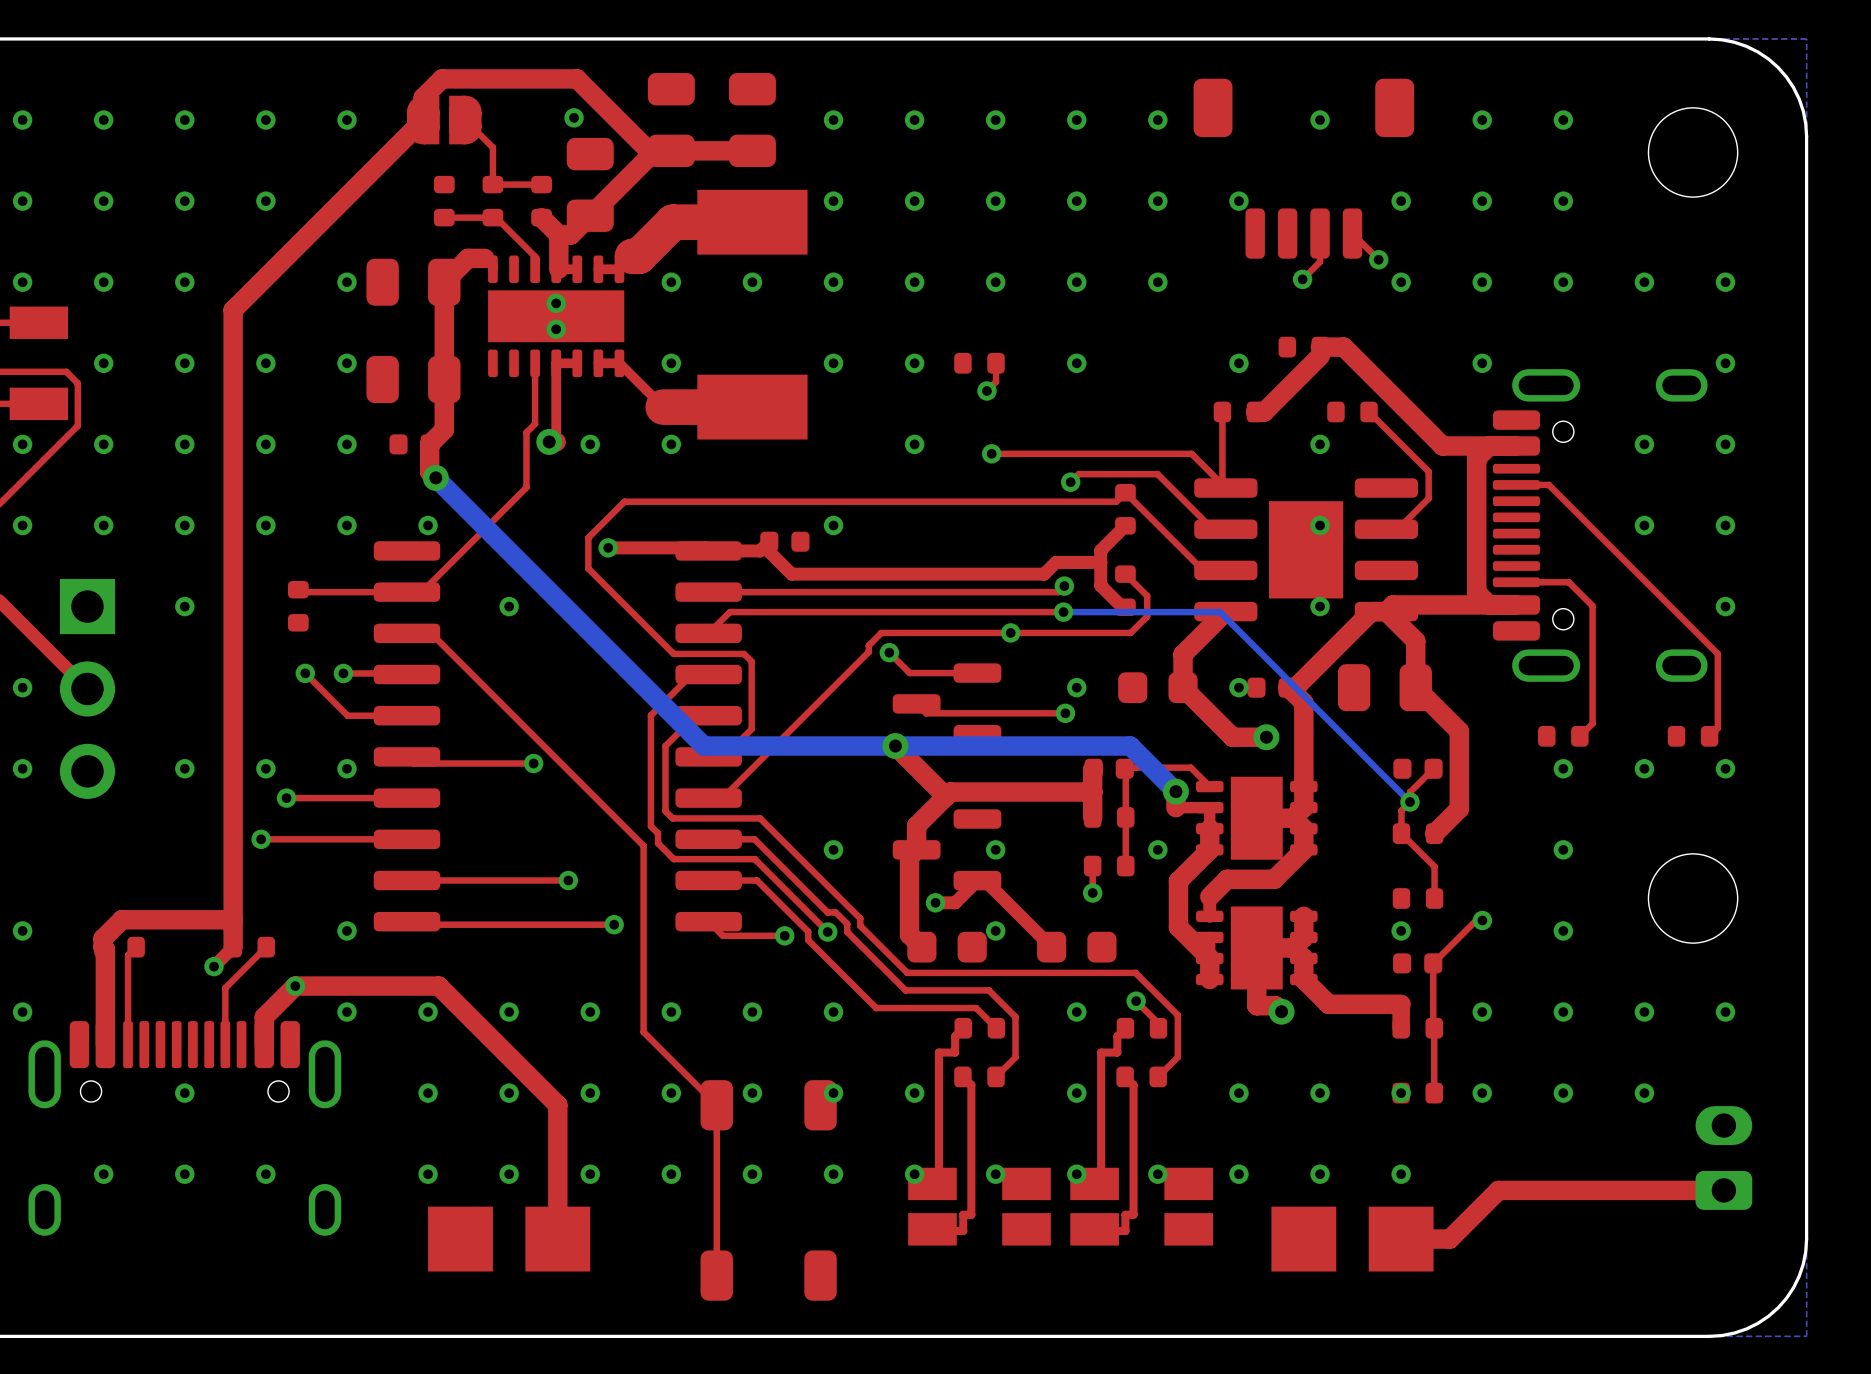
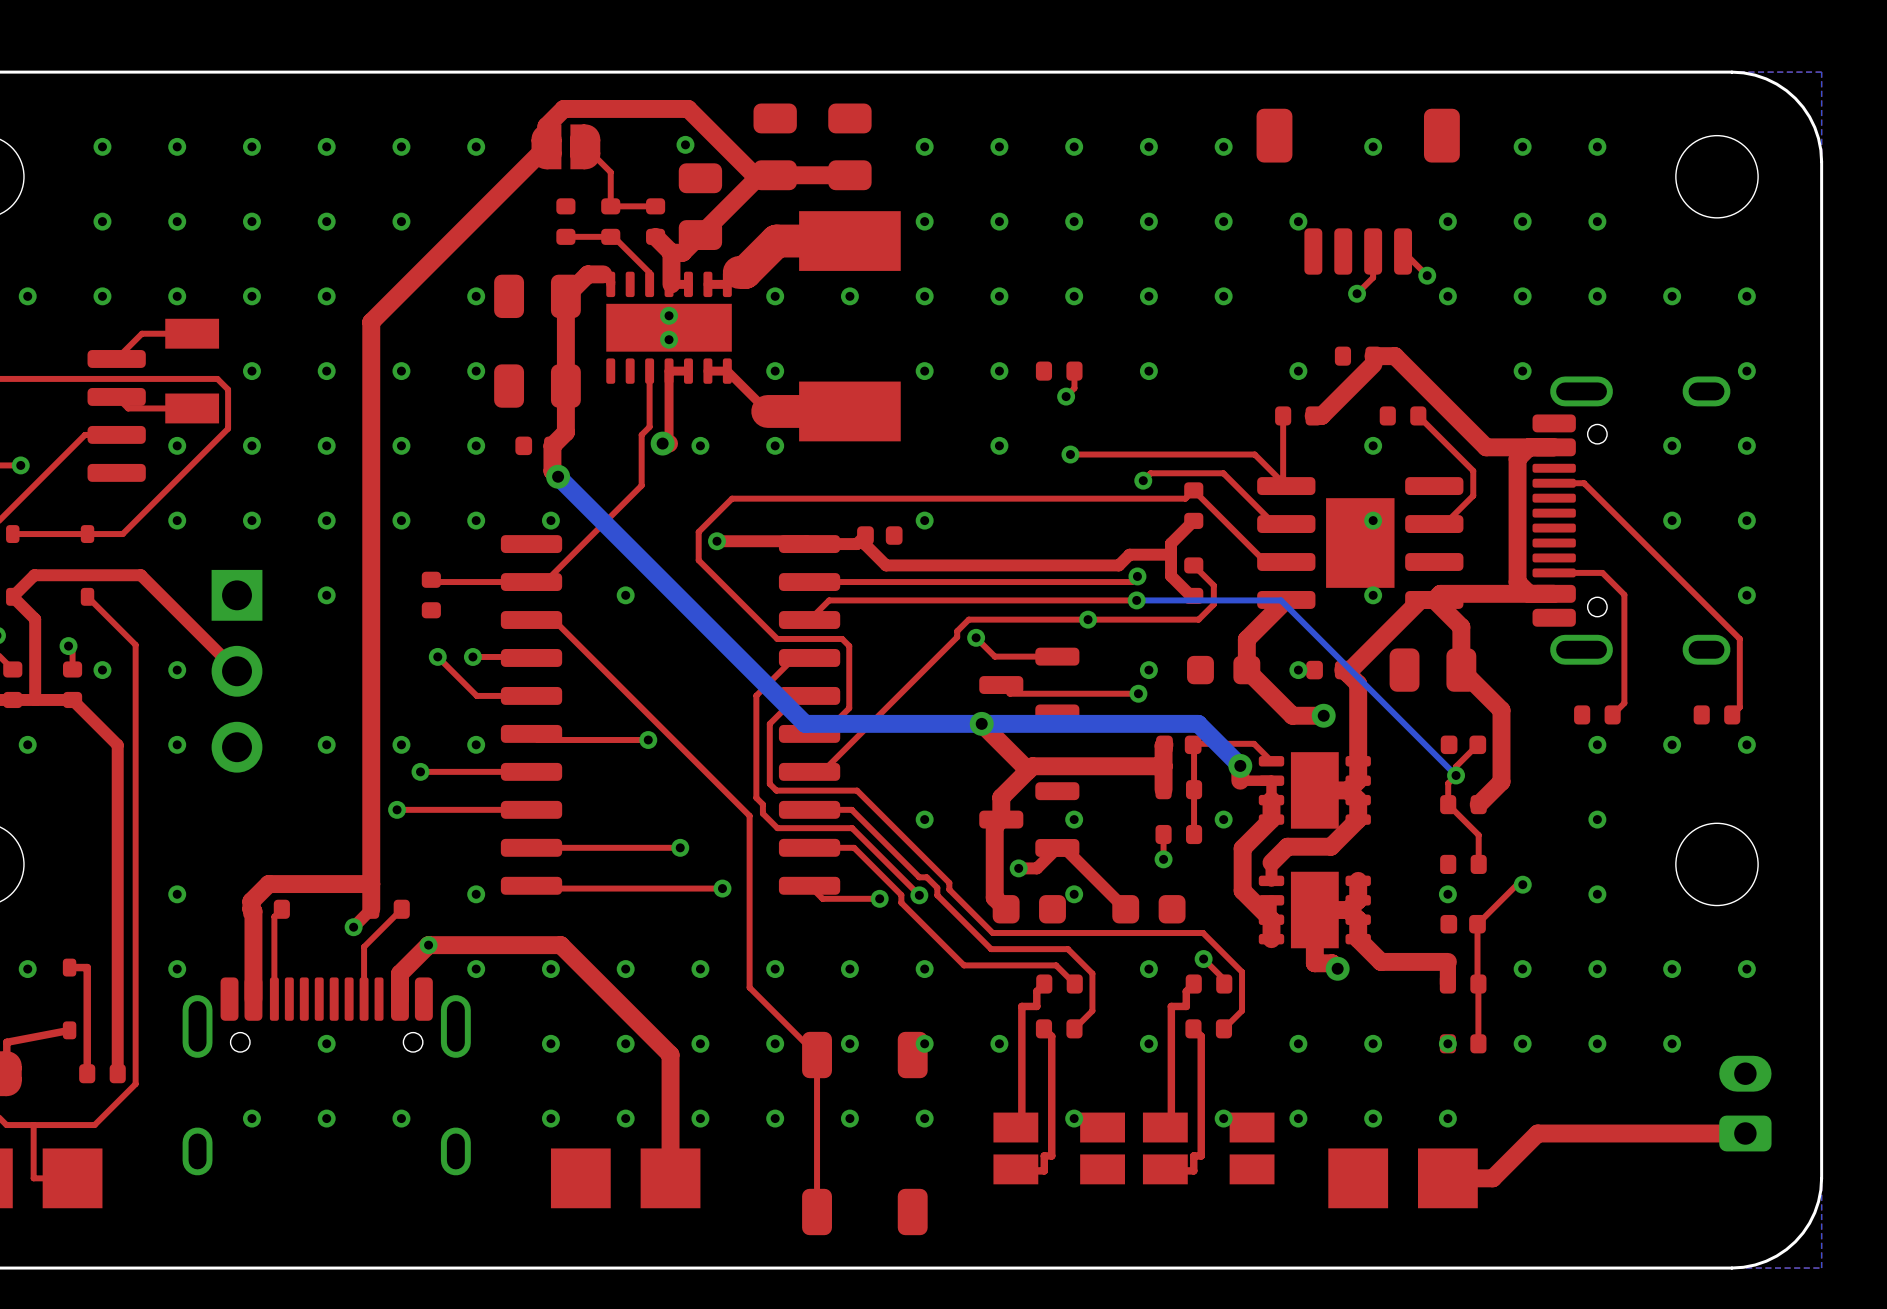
via: (914, 1174) -> none
via: (1076, 1174) -> none

